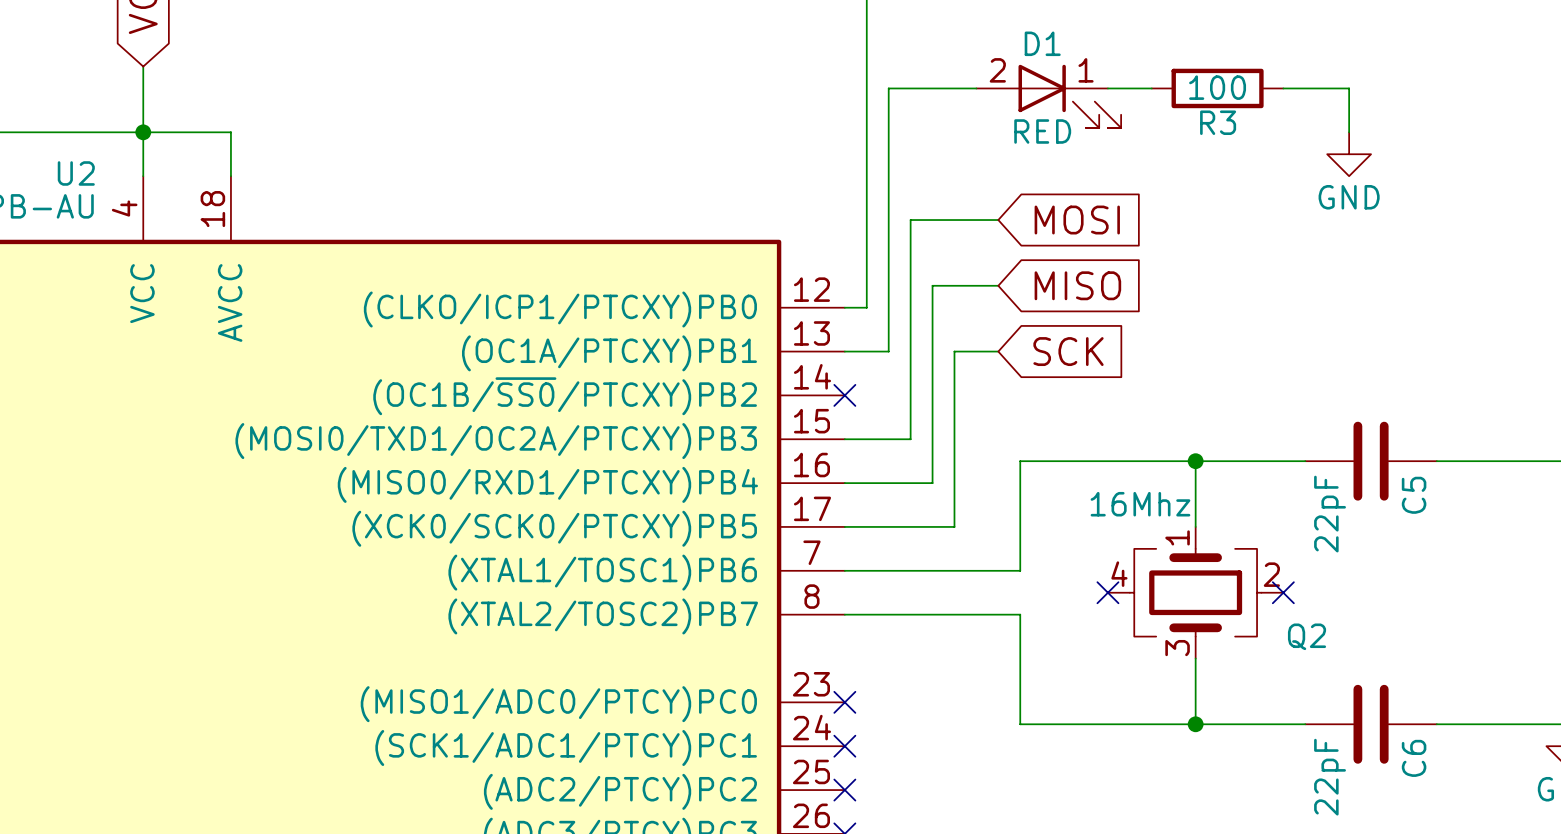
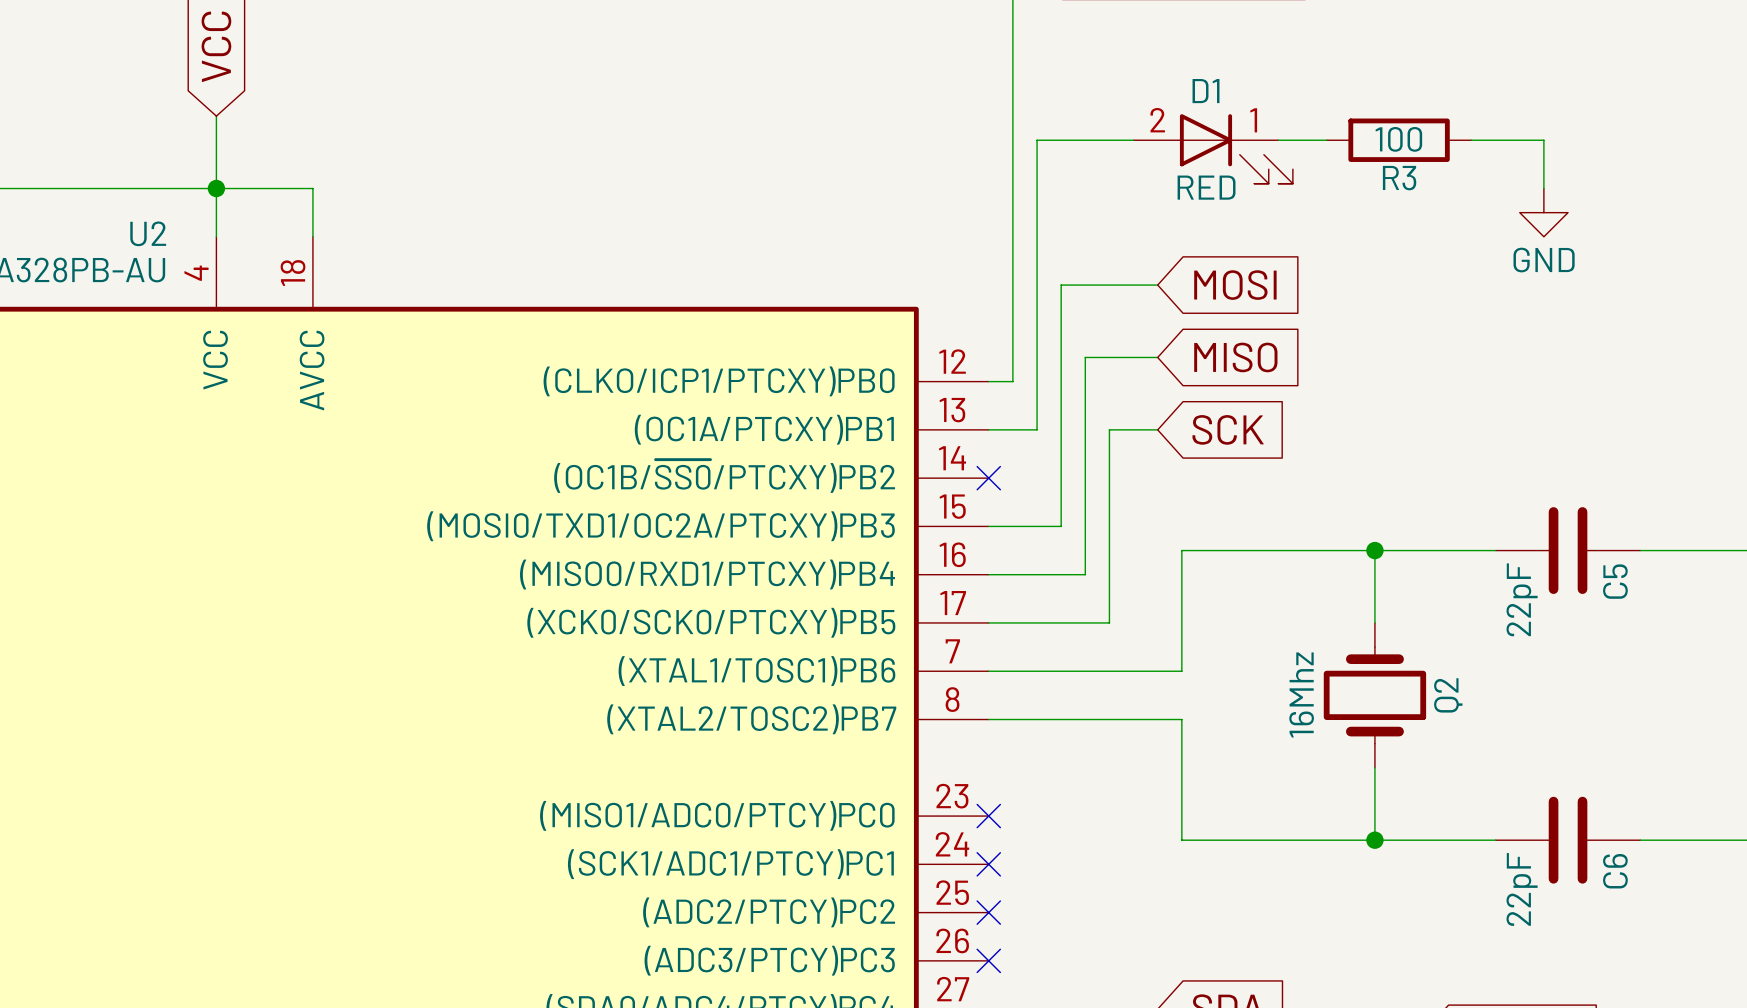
Q2 value position: 16Mhz (1140, 504) -> 16Mhz (1301, 695)
Q2 symbol: [1107, 526, 1284, 659] -> [1323, 622, 1427, 768]
no-connect mark: (1107, 592) -> none
no-connect mark: (1283, 592) -> none
Q2 name position: Q2 (1307, 636) -> Q2 (1448, 695)

